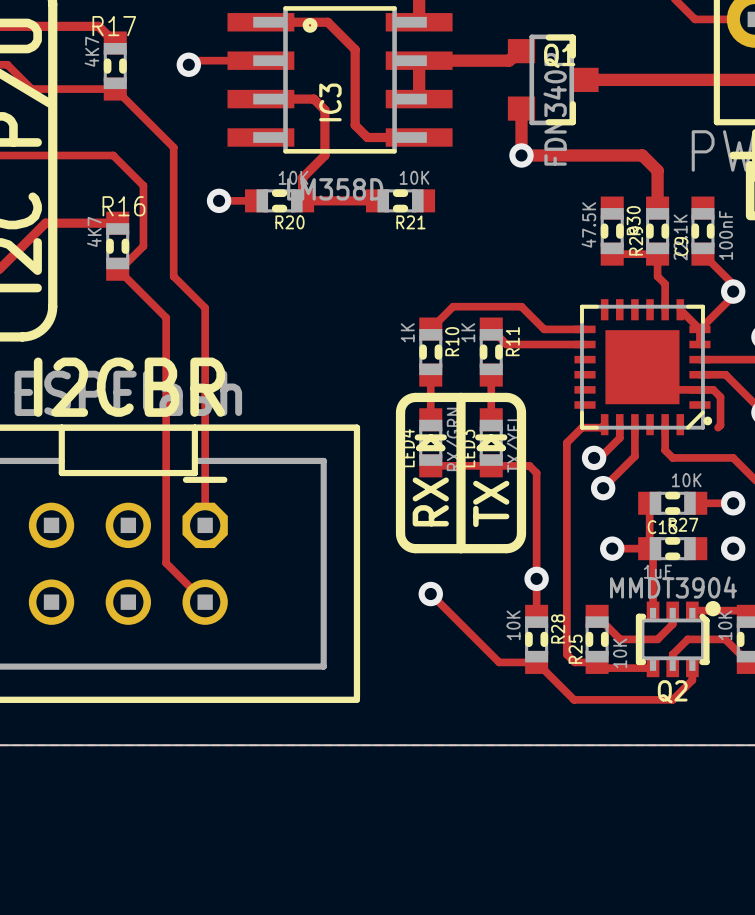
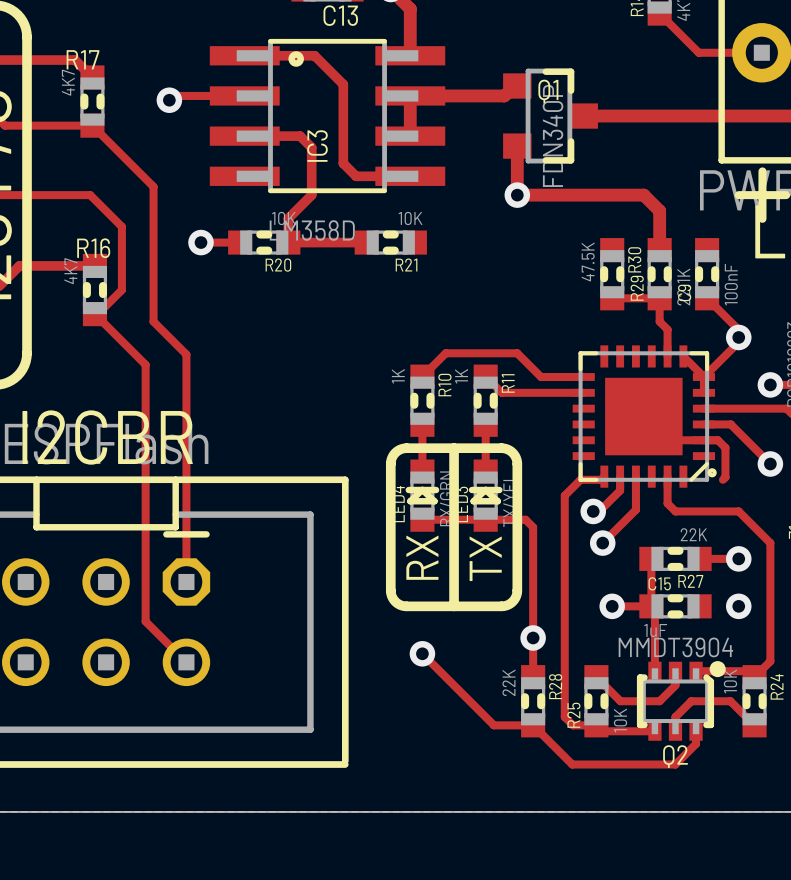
R27 value: 10K (686, 480) -> 22K (693, 534)
R28 value: 10K (513, 625) -> 22K (508, 682)

